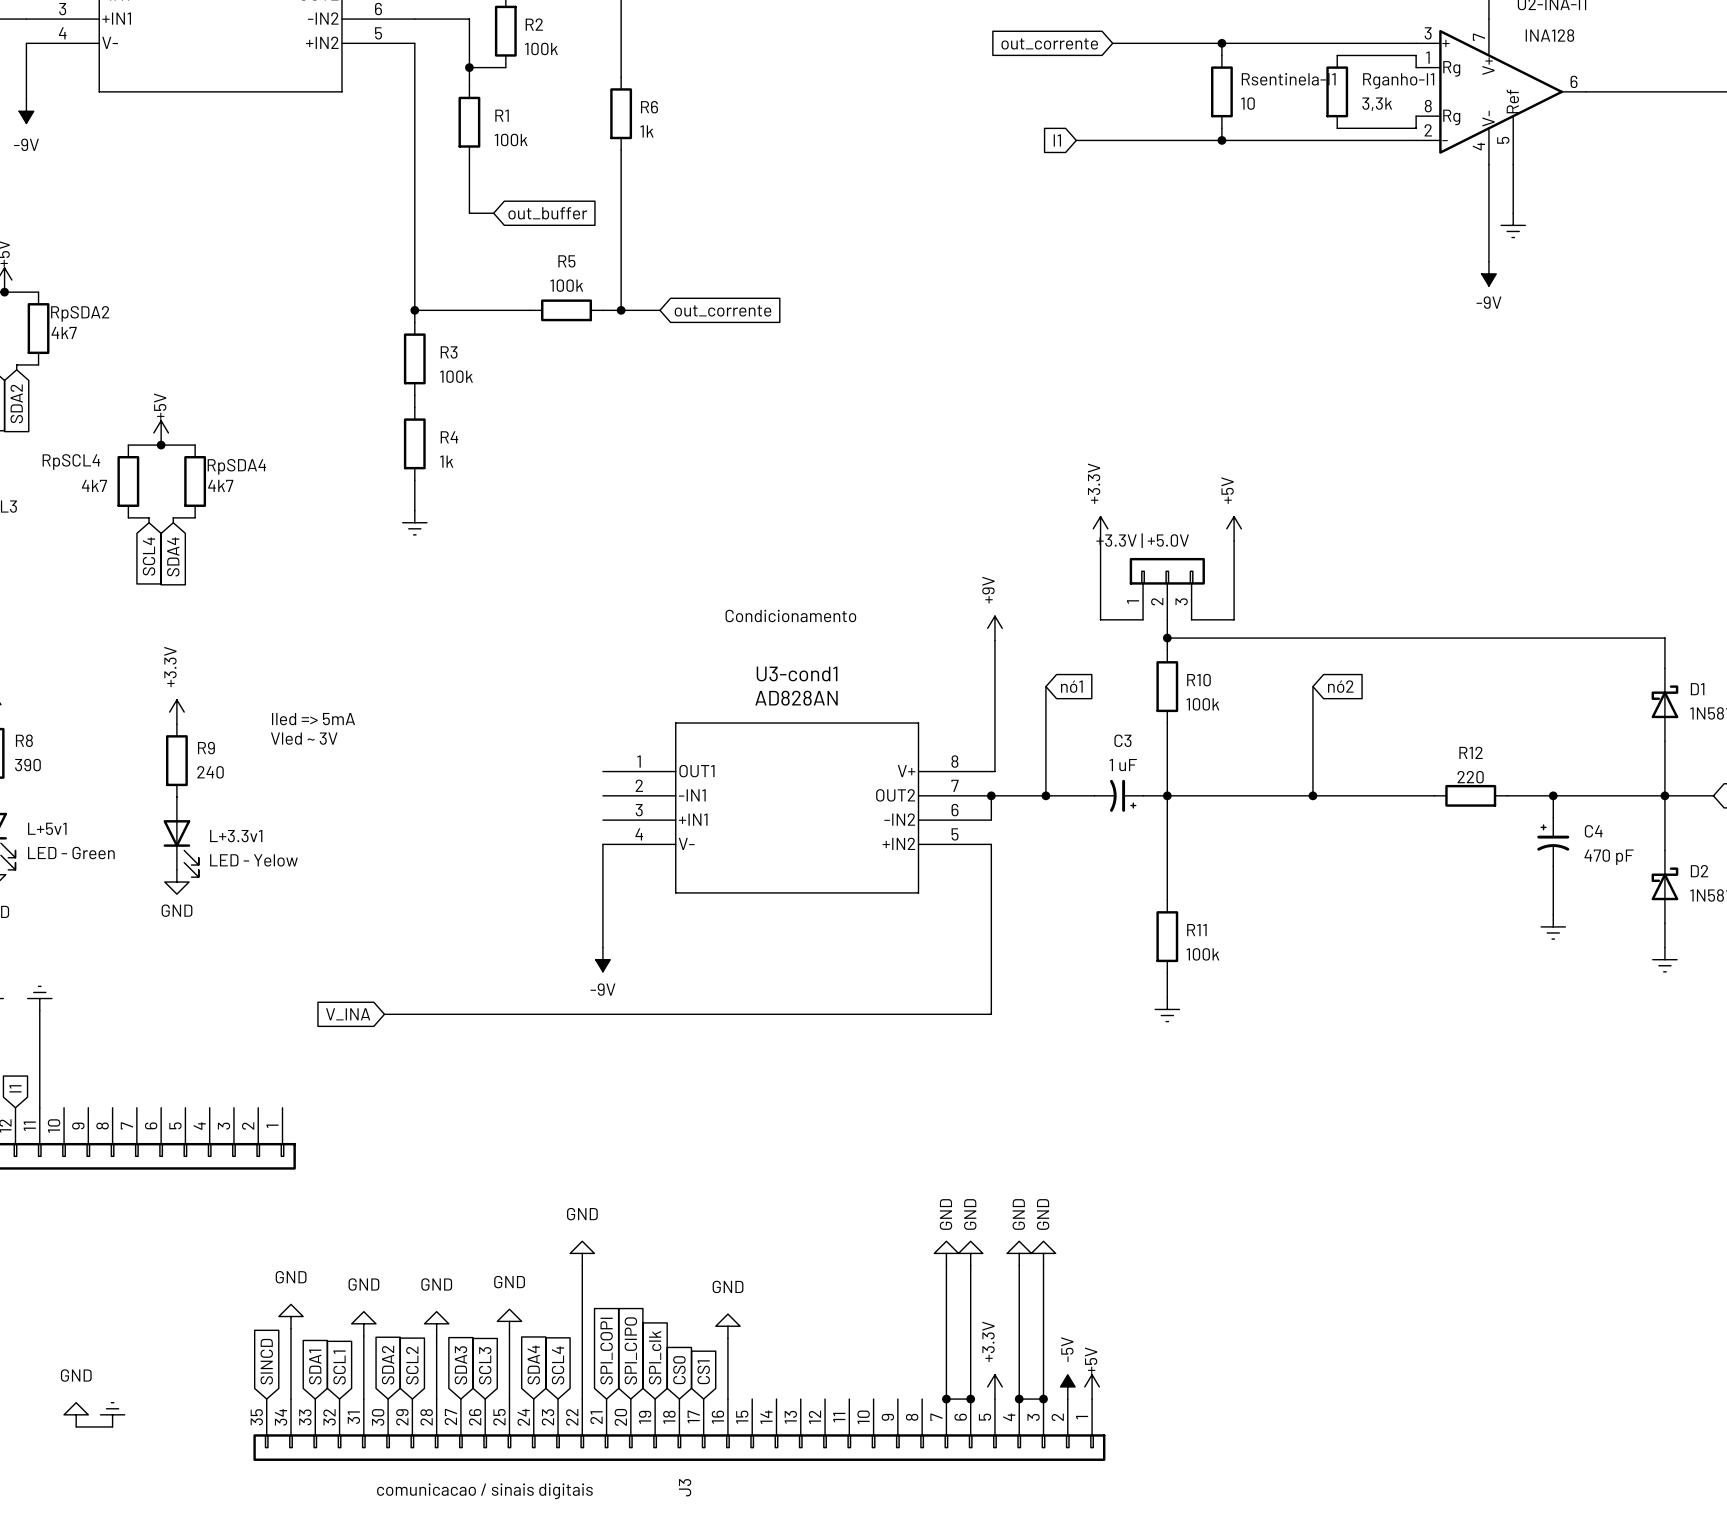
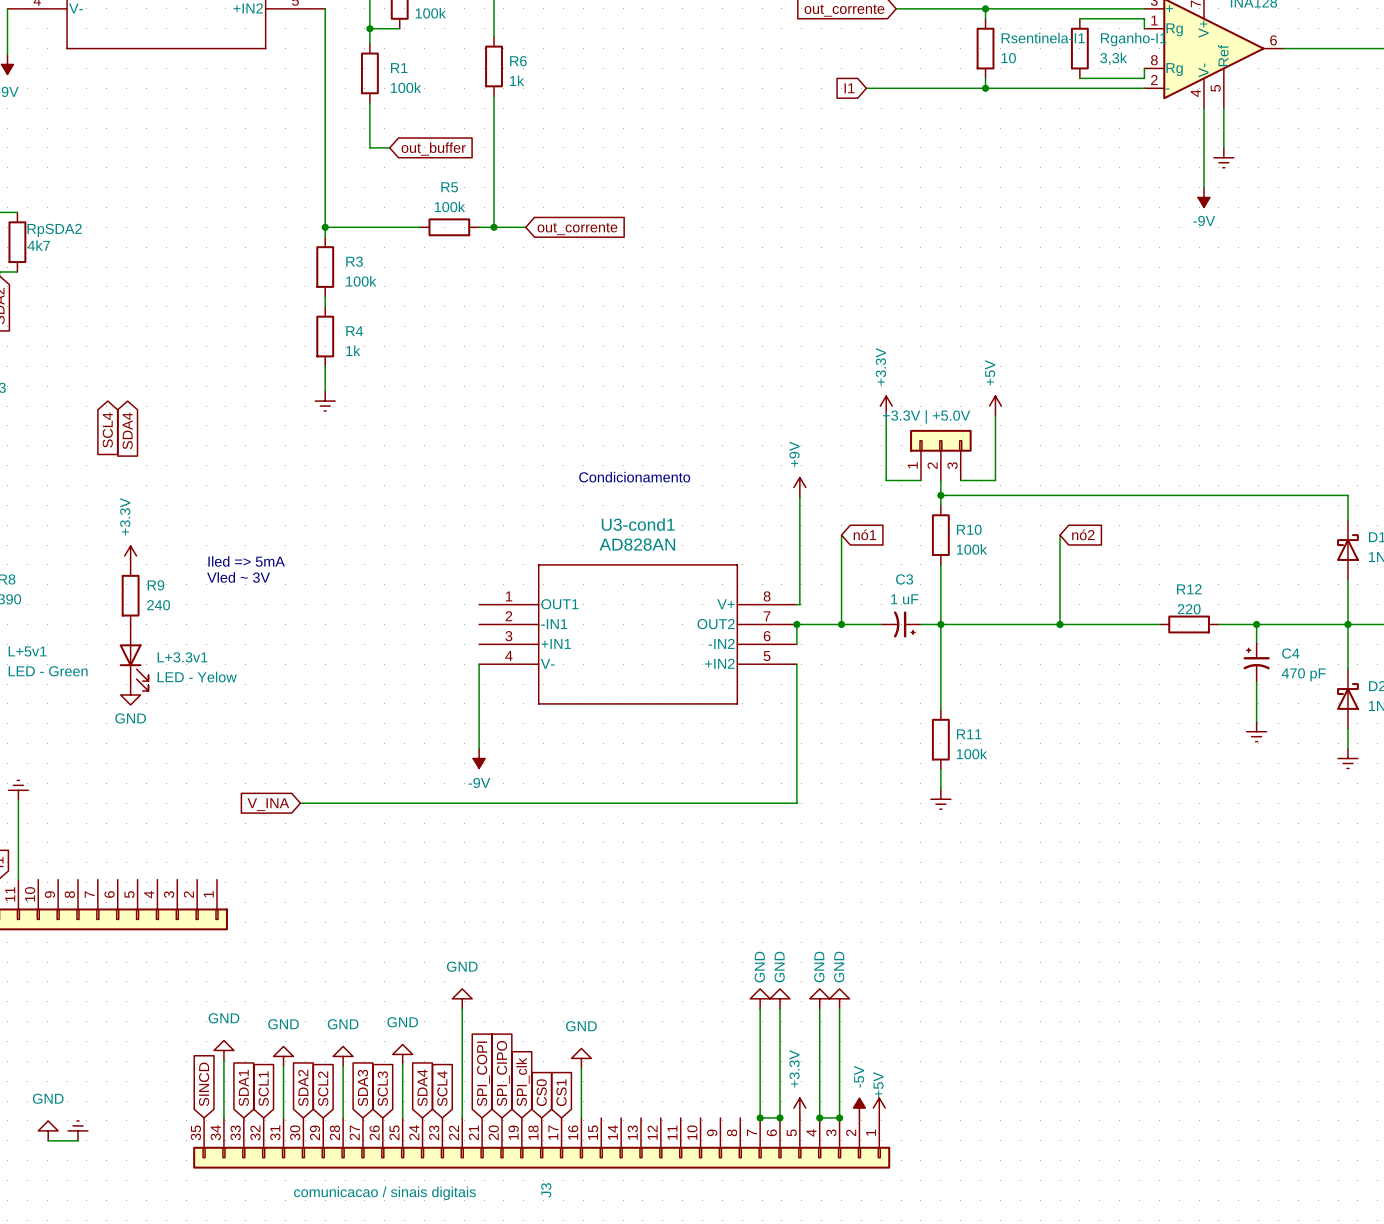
power symbol: +5V (161, 432) -> none
wire: (128, 445) (195, 445) -> none
junction: (161, 445) -> none
RpSCL4: 4k7 (128, 481) -> none
RpSDA4: 4k7 (195, 481) -> none
wire: (128, 517) (149, 517) (149, 522) -> none
wire: (195, 517) (173, 517) (173, 522) -> none

